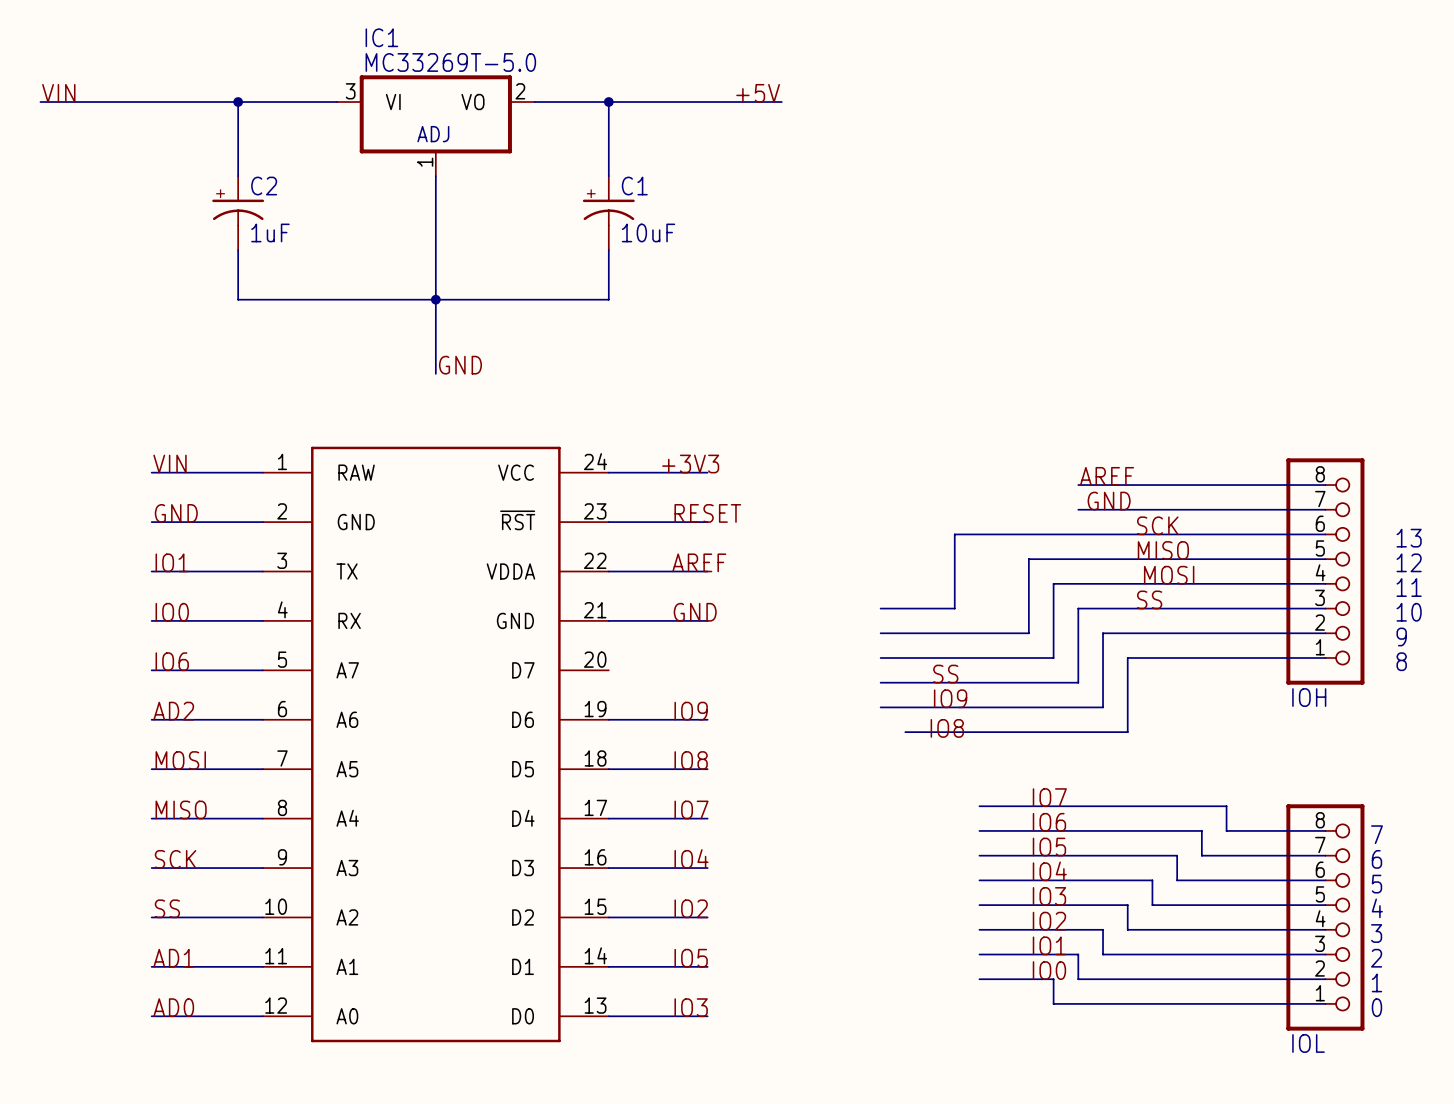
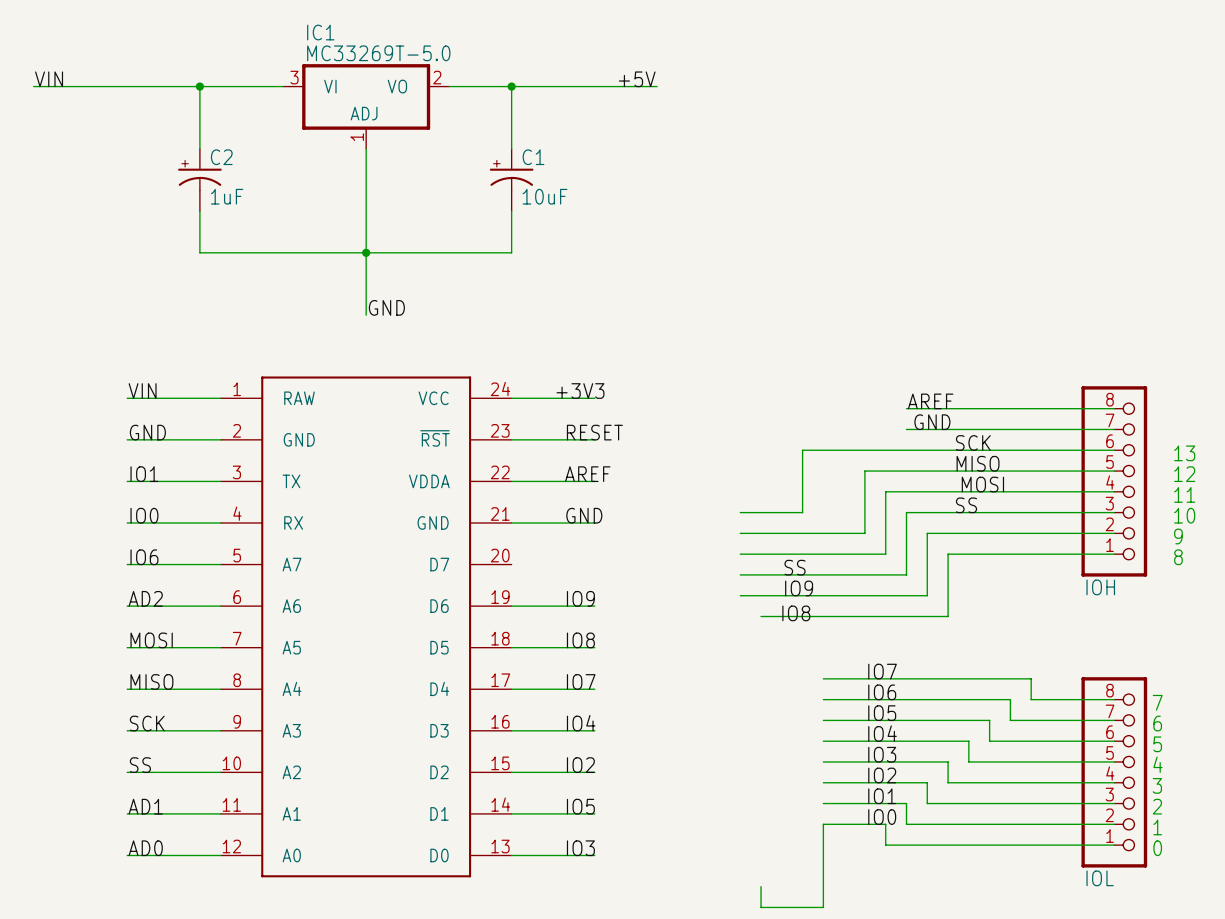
wire: none -> (823, 824) (823, 907) (761, 907) (761, 886)

